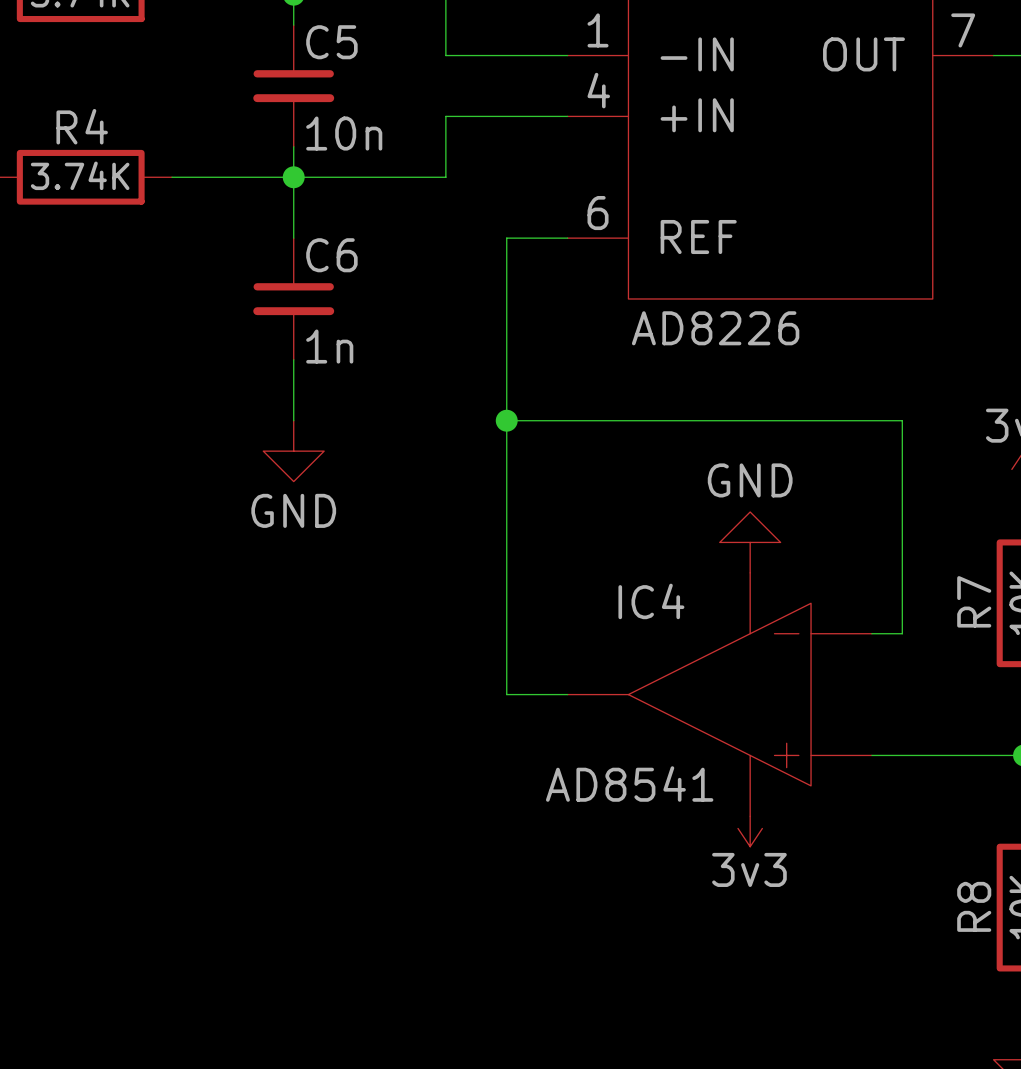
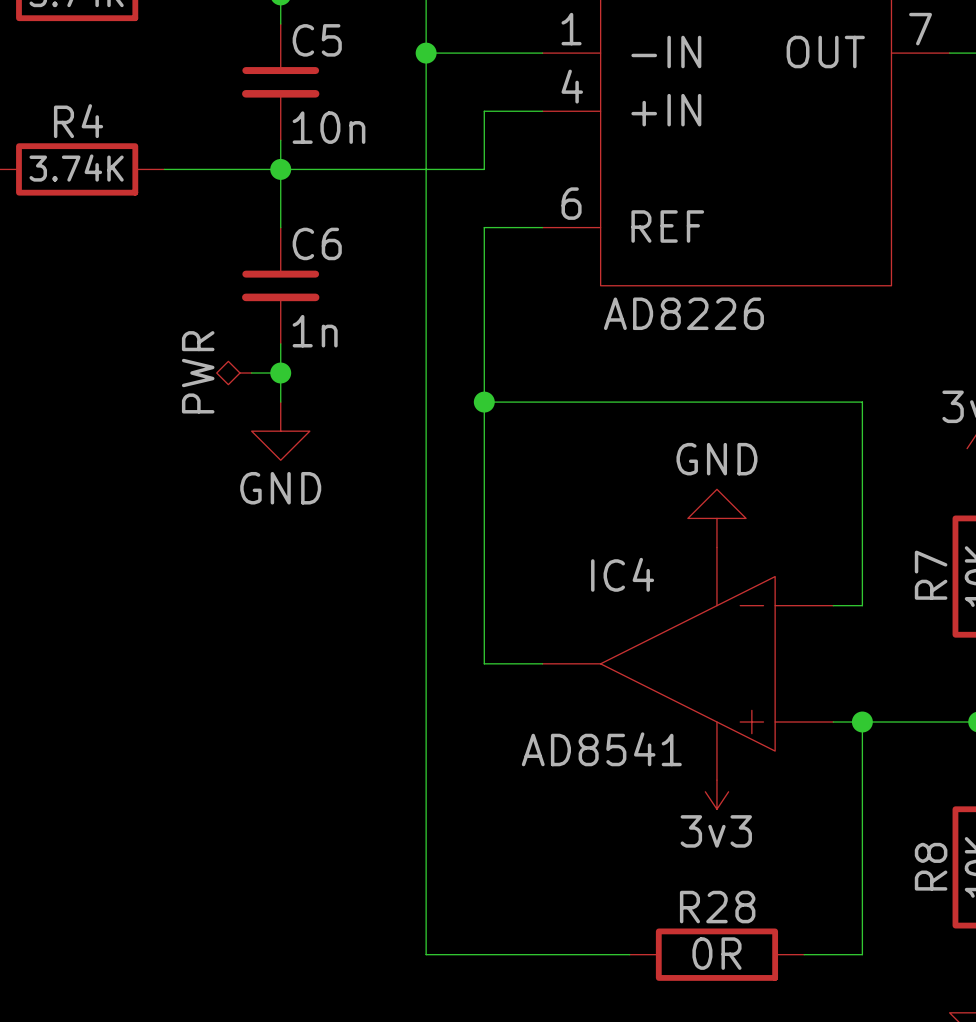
junction: none -> (426, 53)
wire: (445, 116) (506, 116) -> (426, 111) (426, 53)
wire: none -> (484, 111) (484, 169) (426, 169) (426, 954) (629, 954)
power symbol: none -> PWR (234, 373)
wire: none -> (251, 373) (280, 373)
junction: none -> (280, 373)
wire: none -> (862, 722) (862, 954) (804, 954)
junction: none -> (862, 722)
R28: none -> 0R (716, 954)

